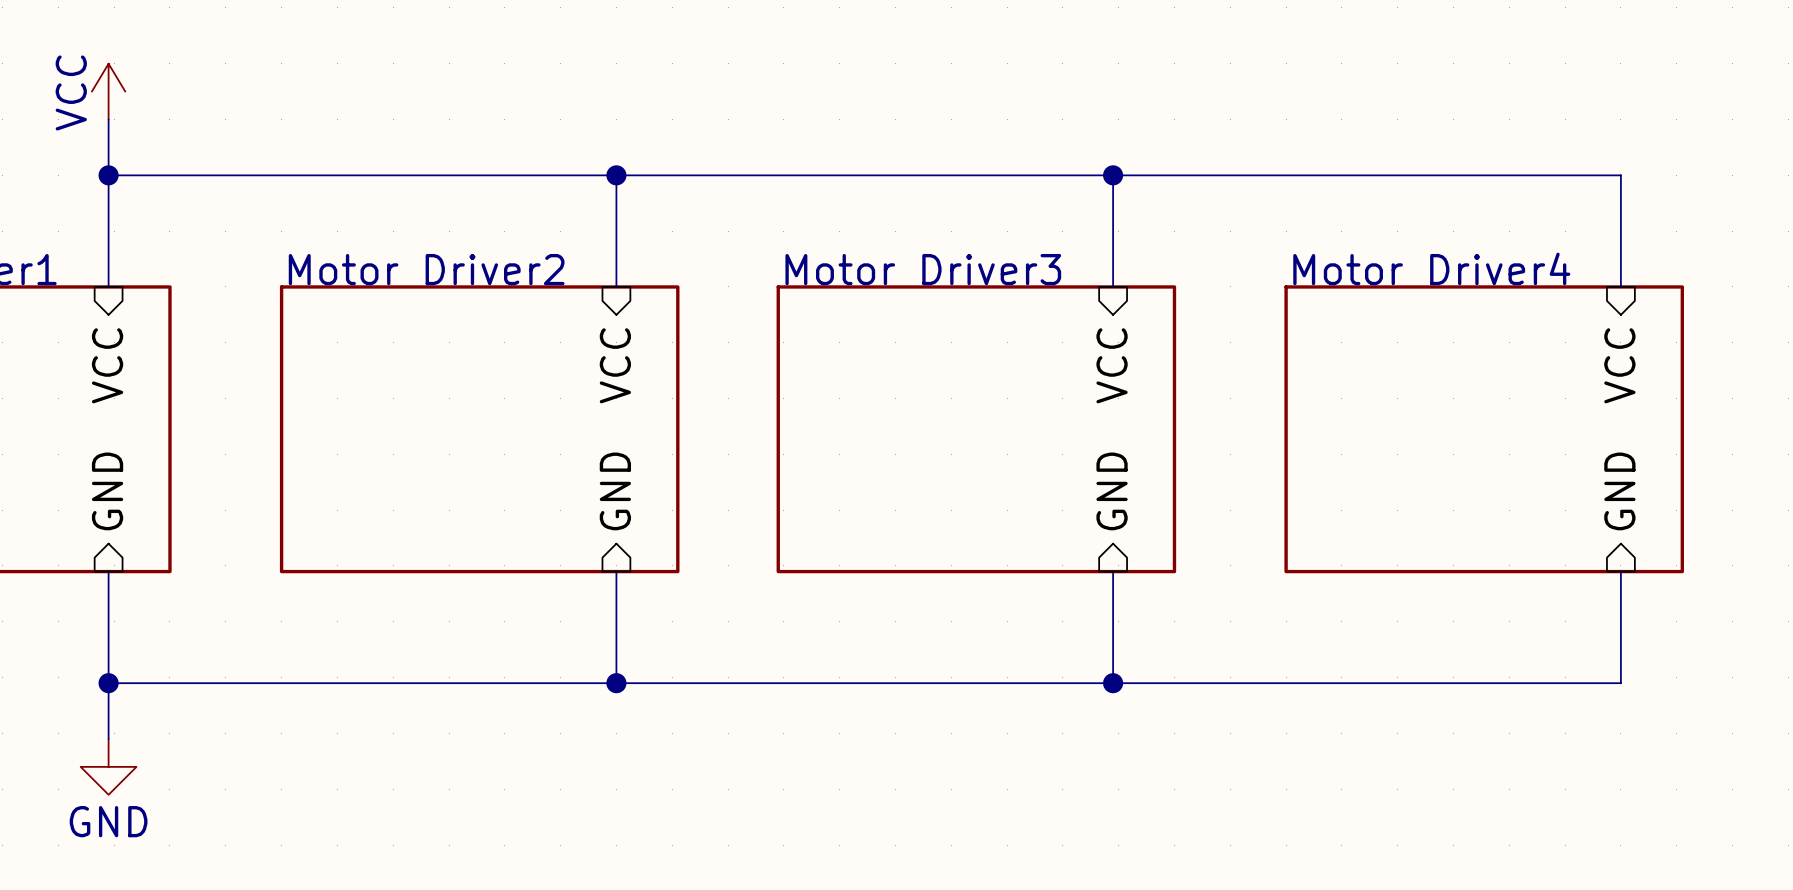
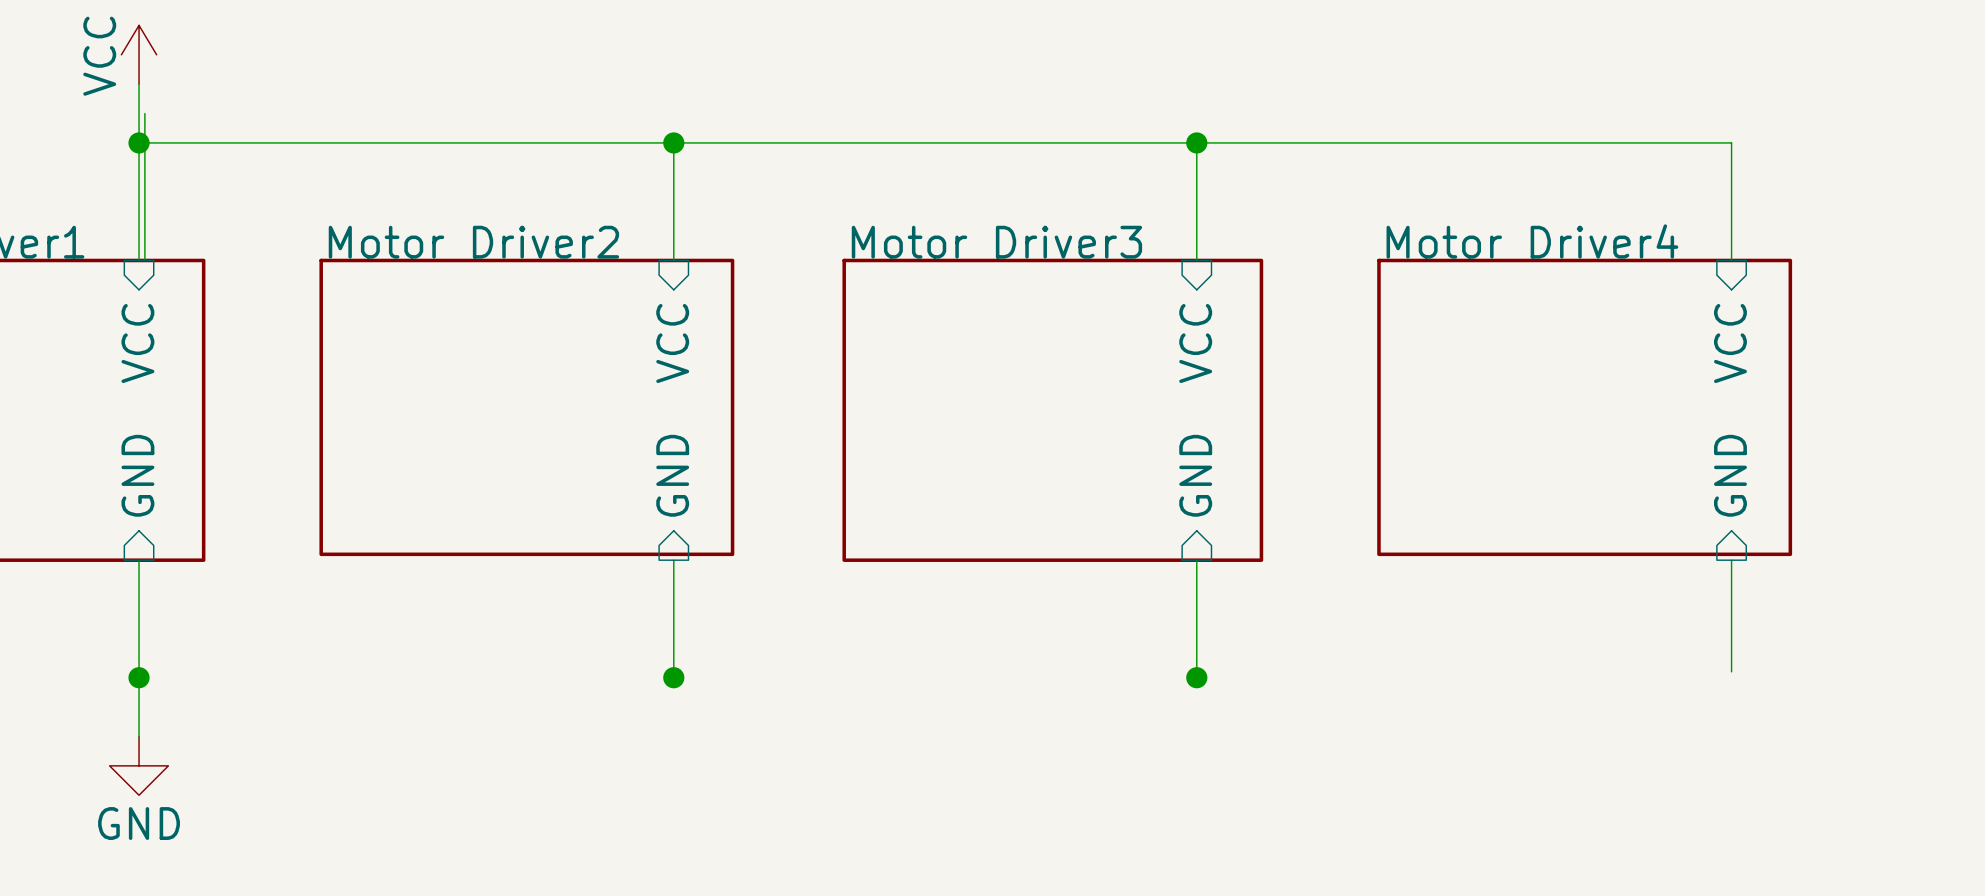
wire: none -> (144, 113) (144, 260)
sheet Motor Driver2 shape: [279, 285, 680, 574] -> [319, 258, 735, 557]
sheet Motor Driver4 shape: [1284, 285, 1684, 574] -> [1377, 258, 1793, 557]
wire: (1620, 677) (1620, 683) (108, 683) -> none

